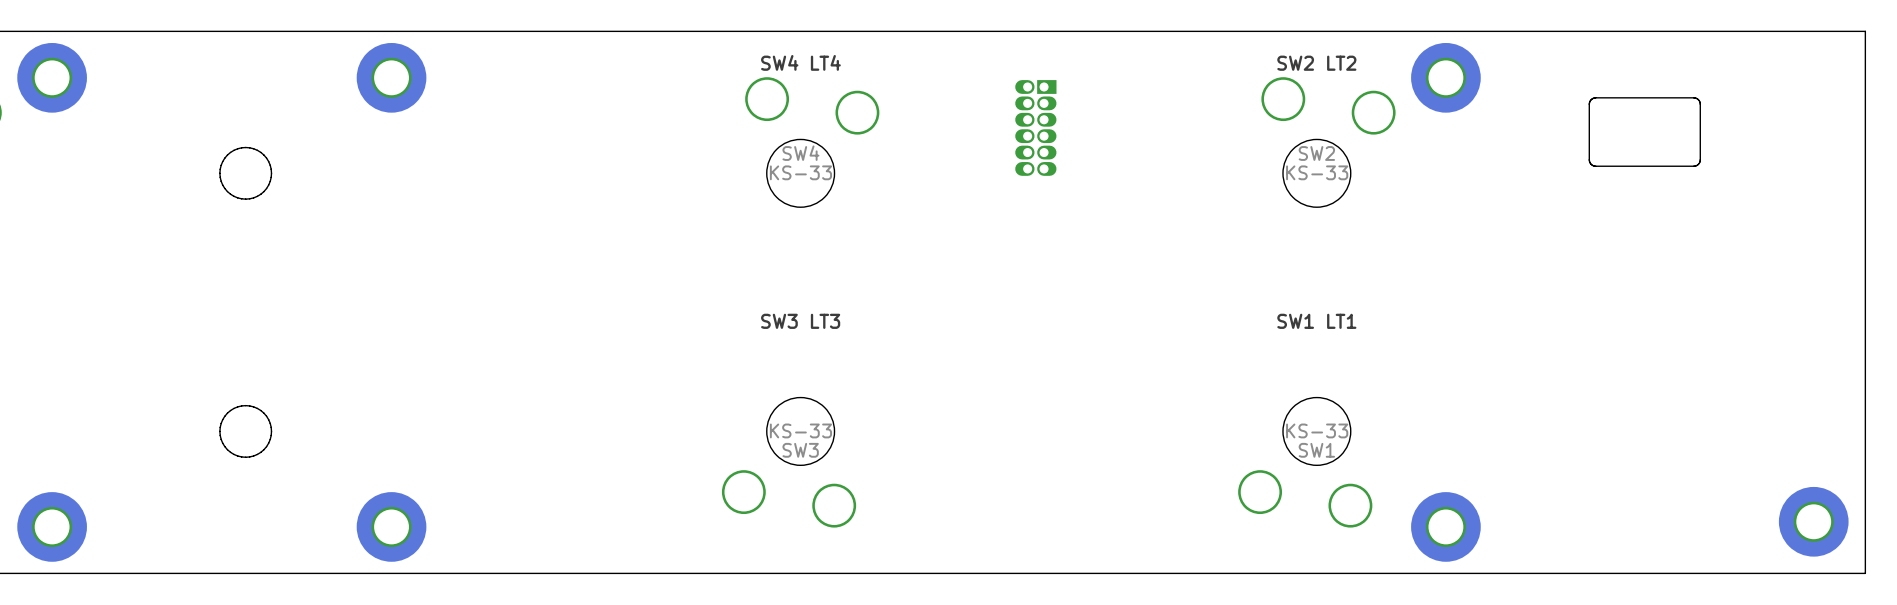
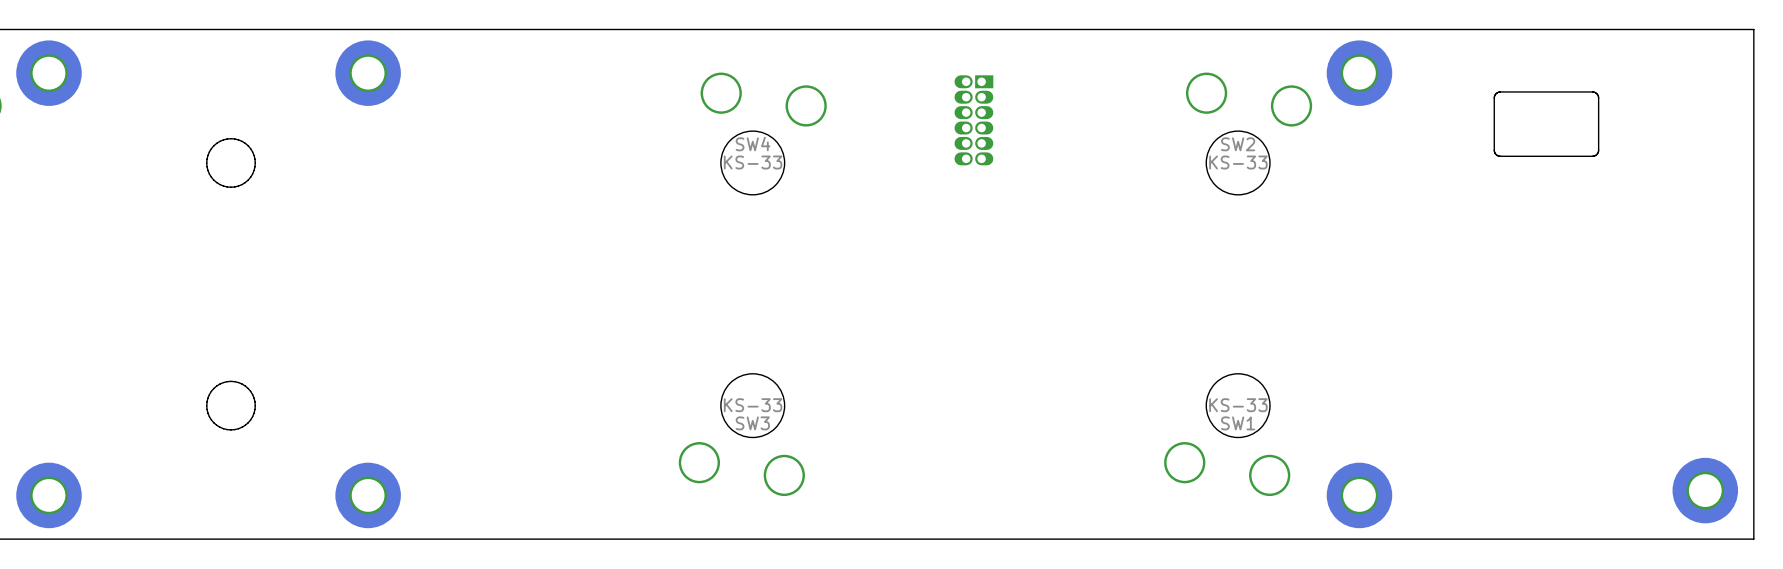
text: SW4 LT4 (800, 62) -> none
text: SW2 LT2 (1316, 63) -> none
text: SW3 LT3 (800, 321) -> none
text: SW1 LT1 (1316, 321) -> none

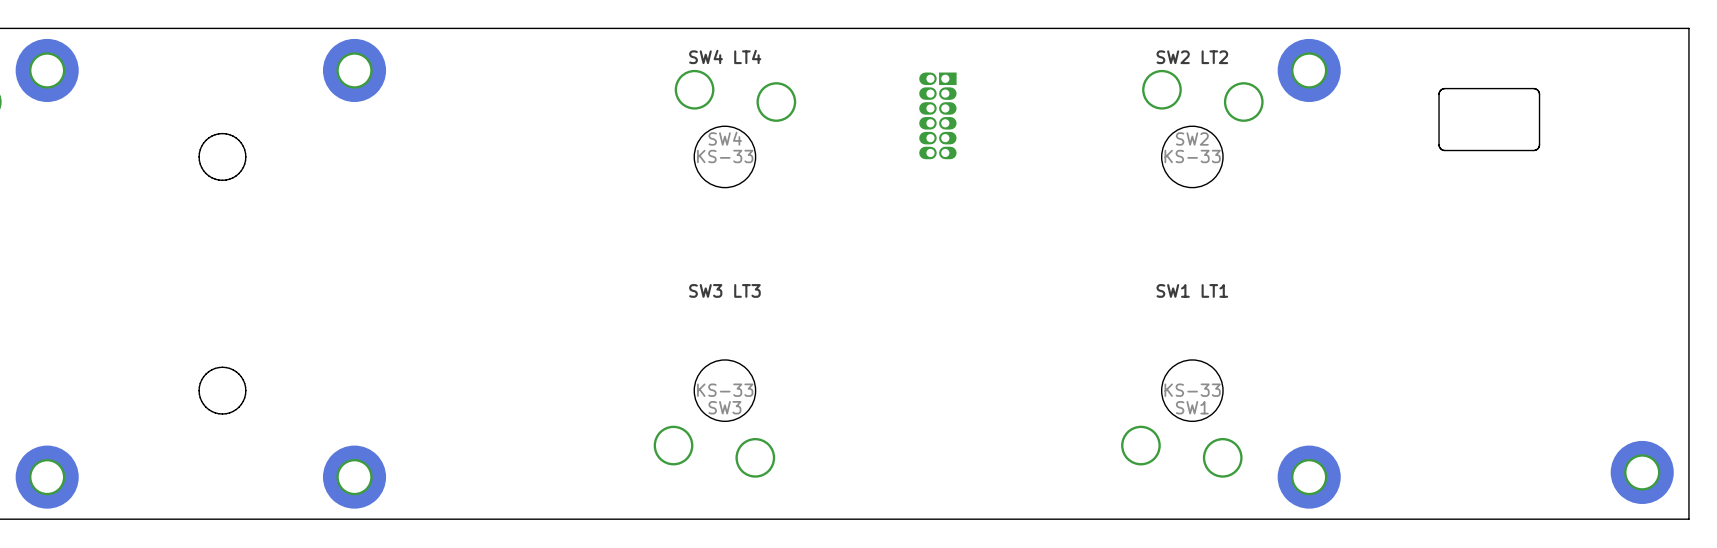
text: none -> SW4 LT4 (725, 56)
text: none -> SW2 LT2 (1192, 57)
text: none -> SW3 LT3 (724, 290)
text: none -> SW1 LT1 (1192, 290)

